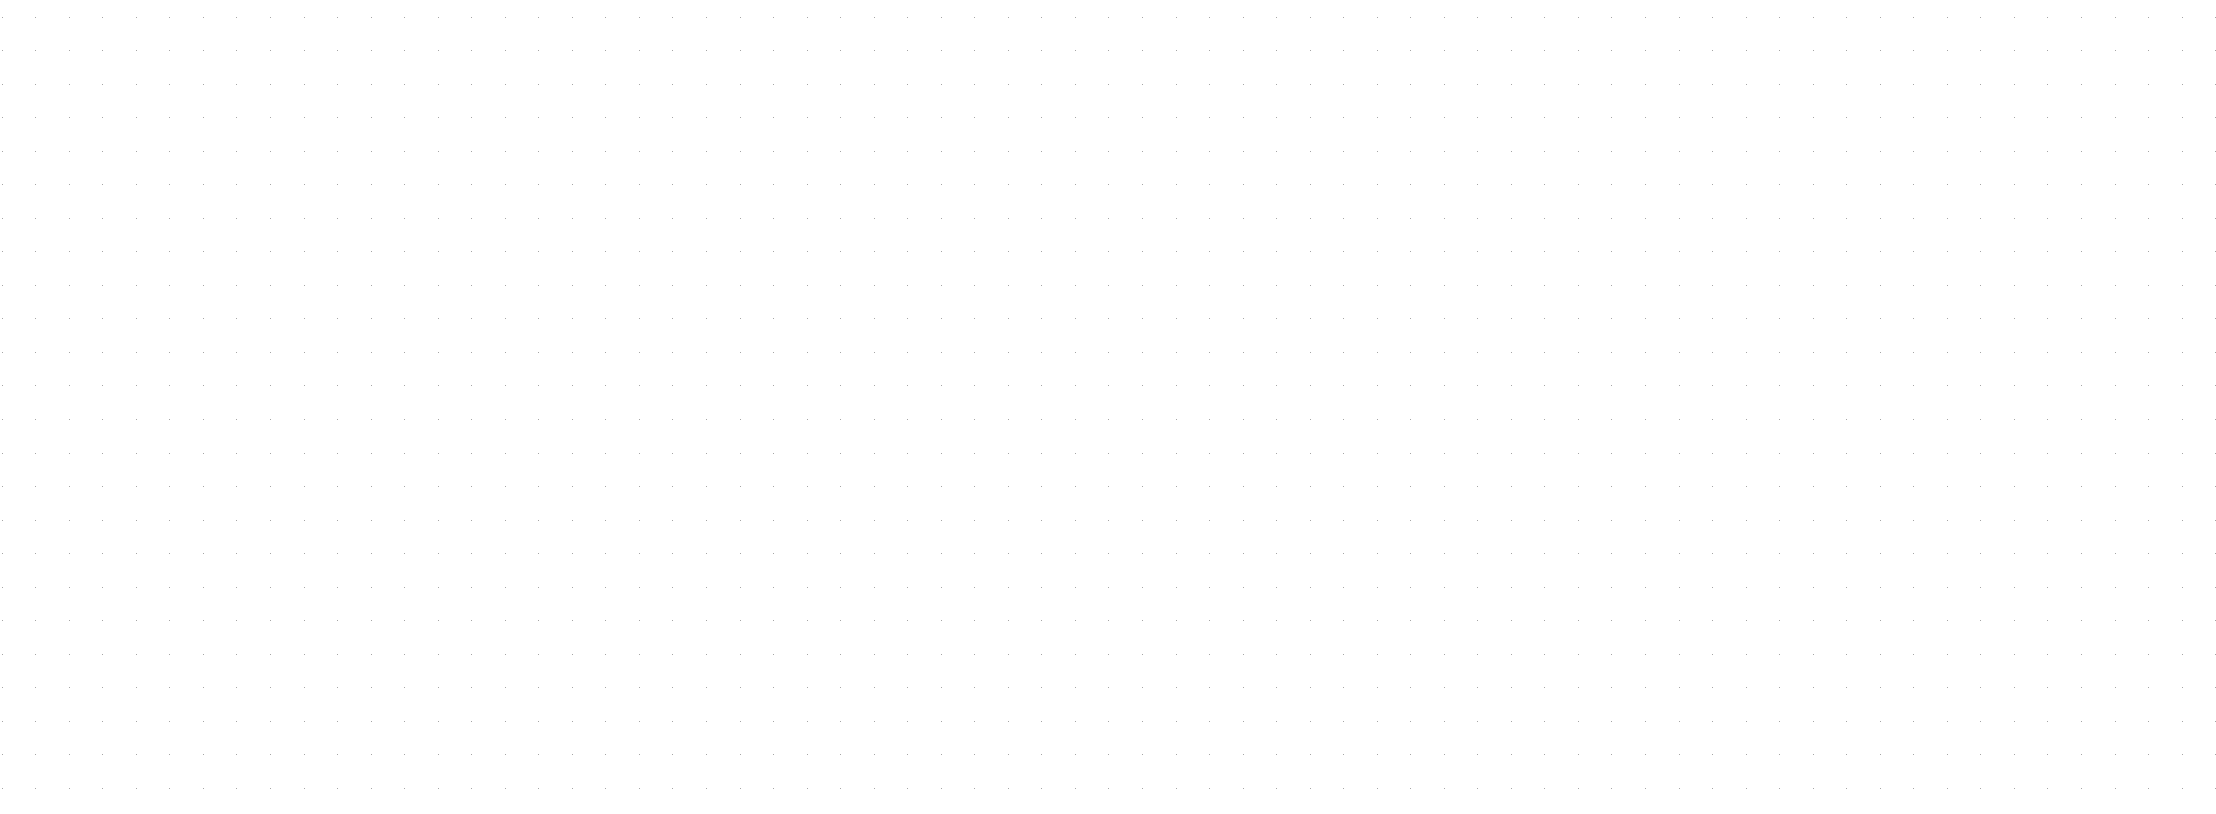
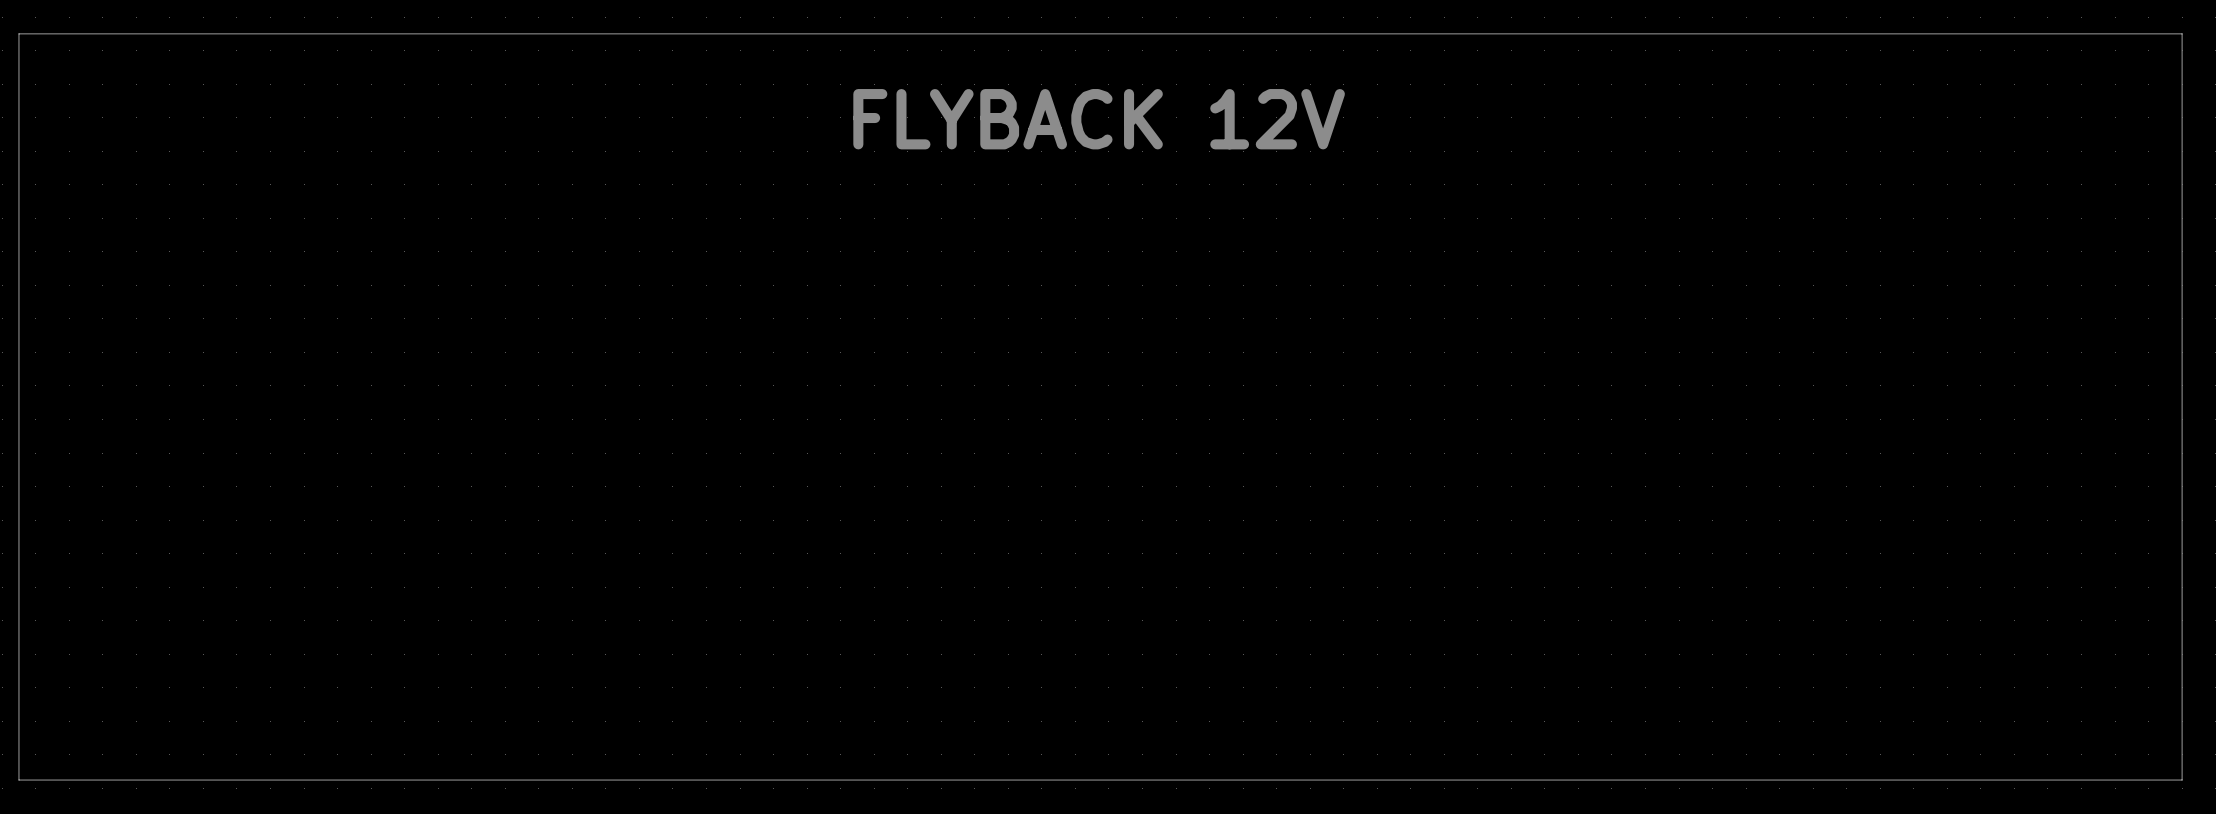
line: none -> (18, 33) (2182, 33) (2182, 780) (18, 780) (18, 33)
text: none -> FLYBACK 12V (1099, 119)

